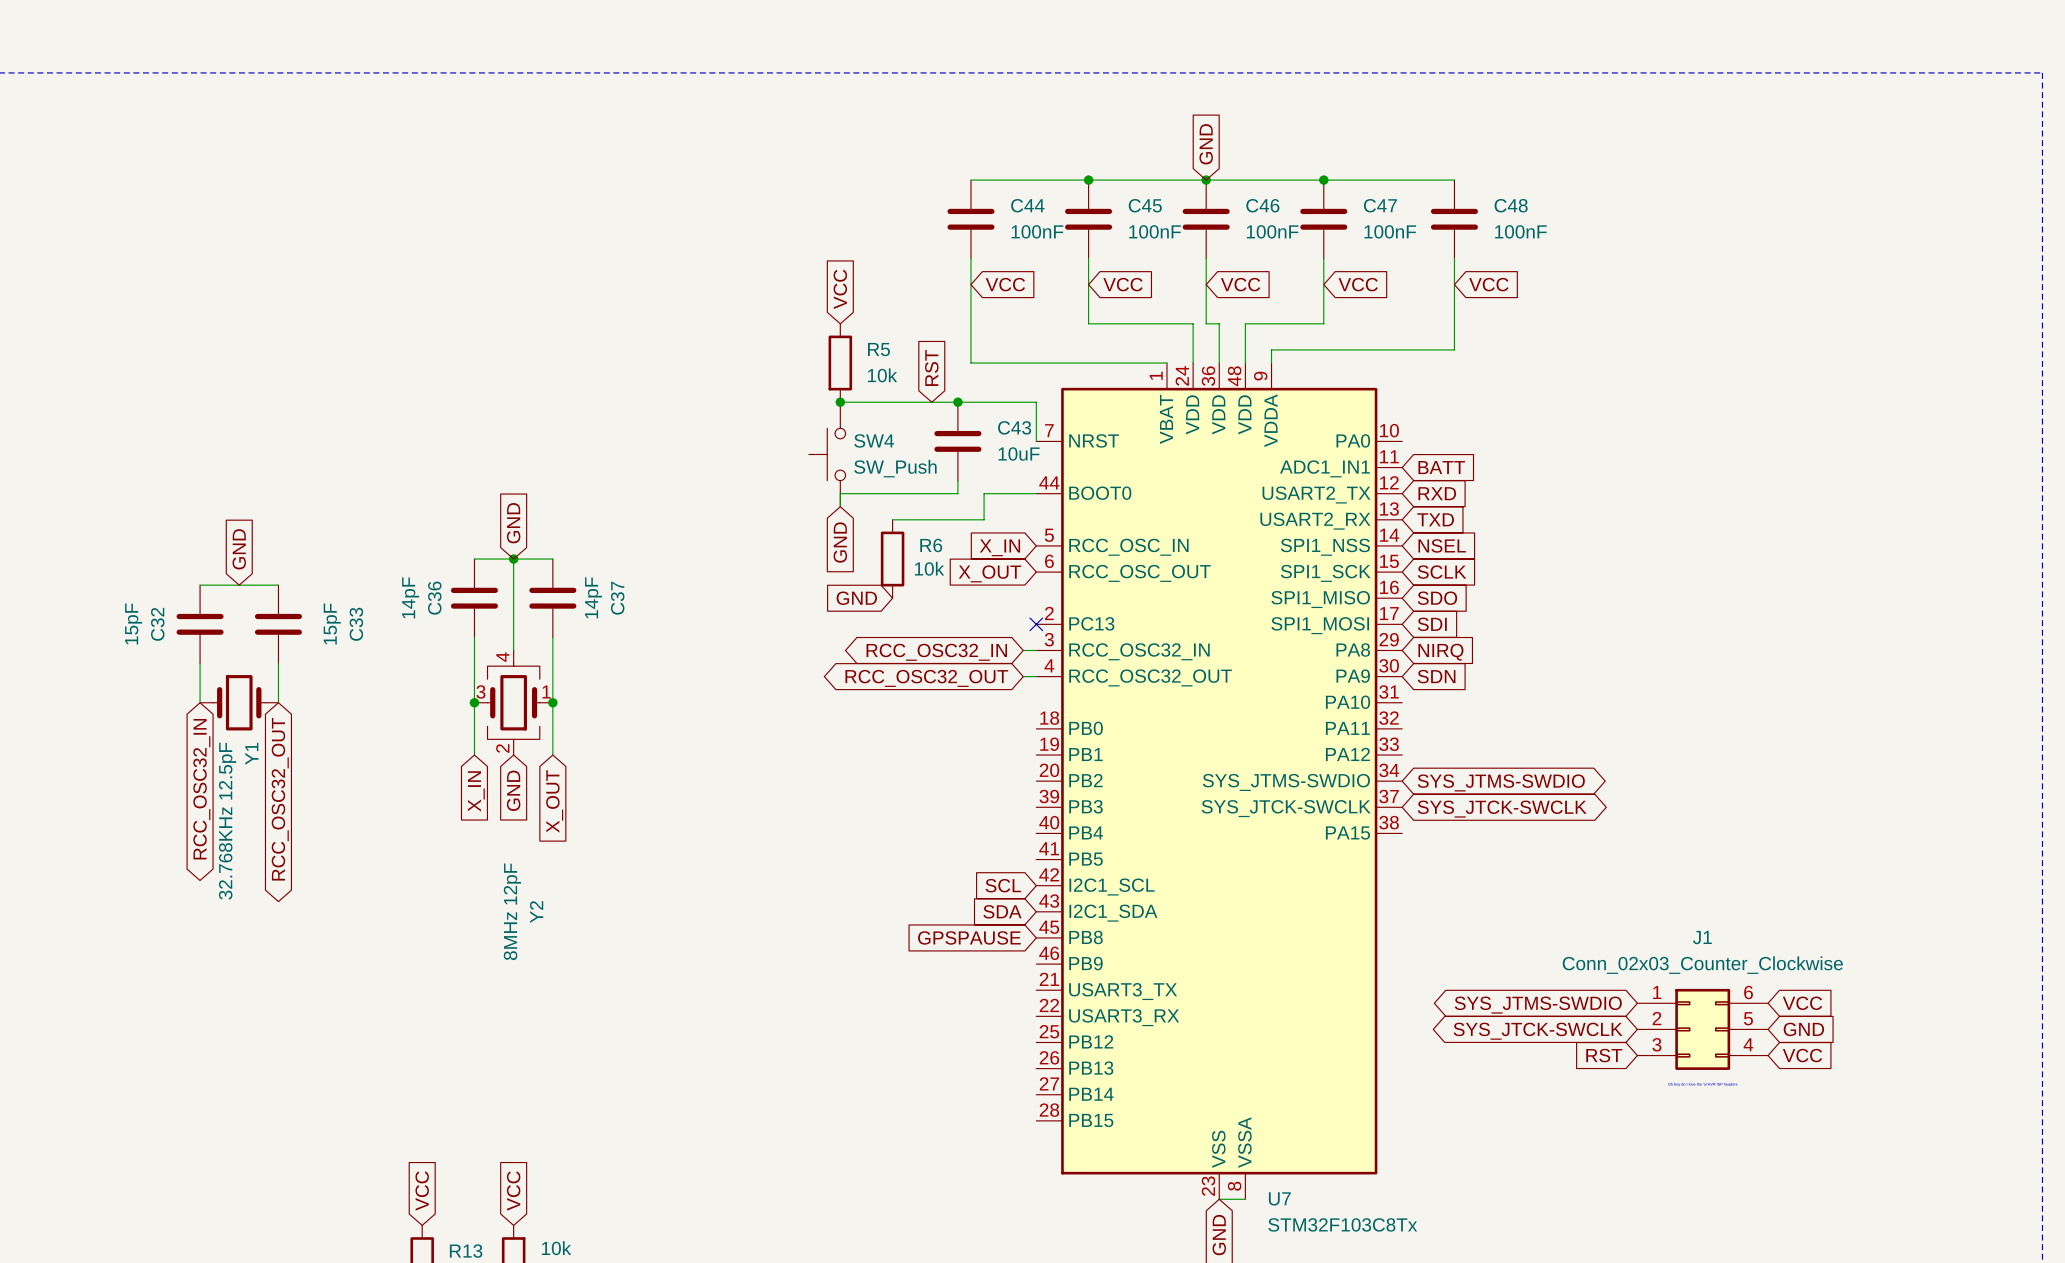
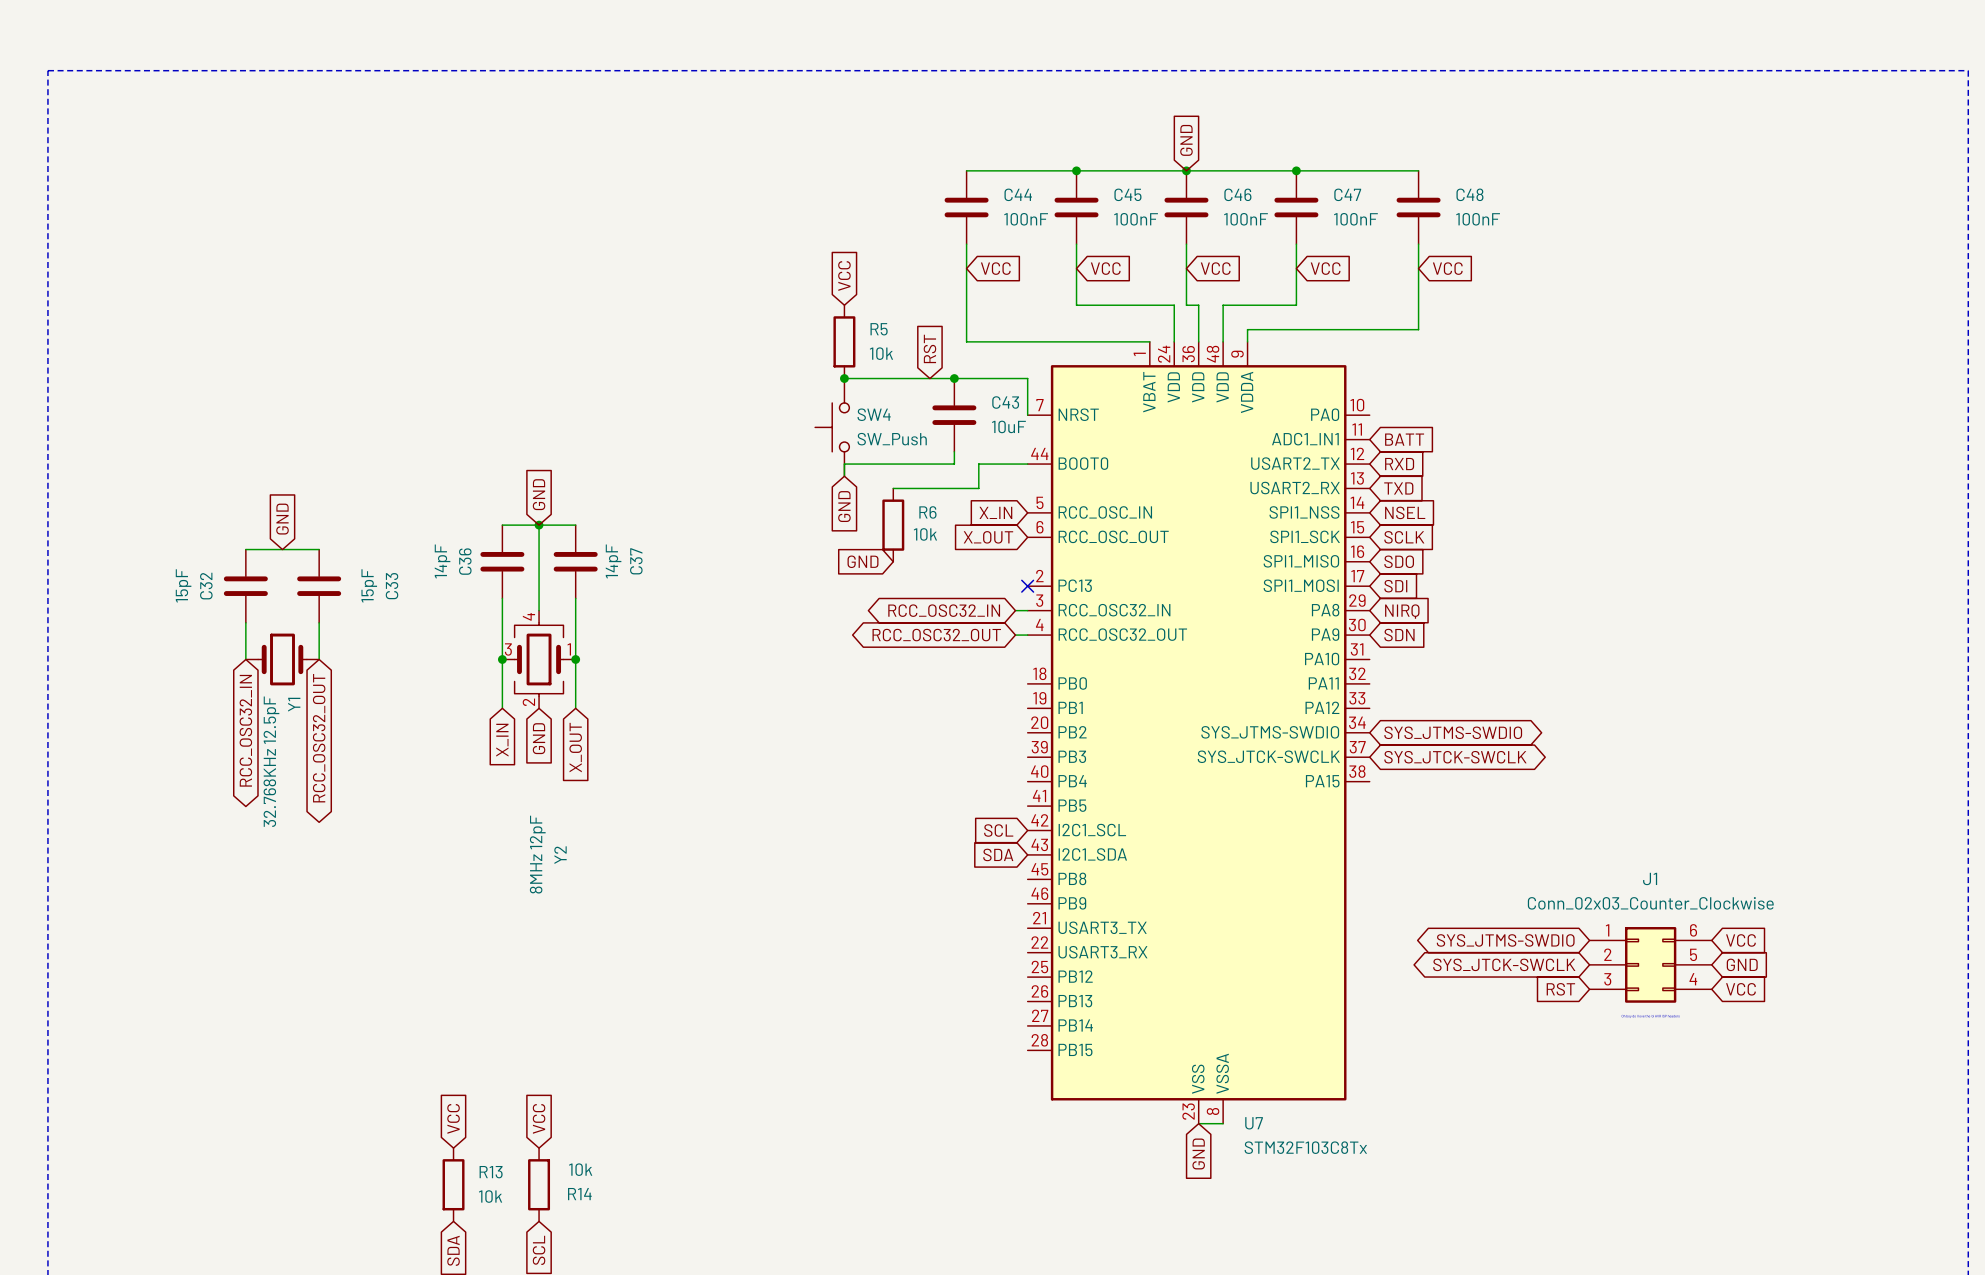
global label: GPSPAUSE (969, 937) -> none

